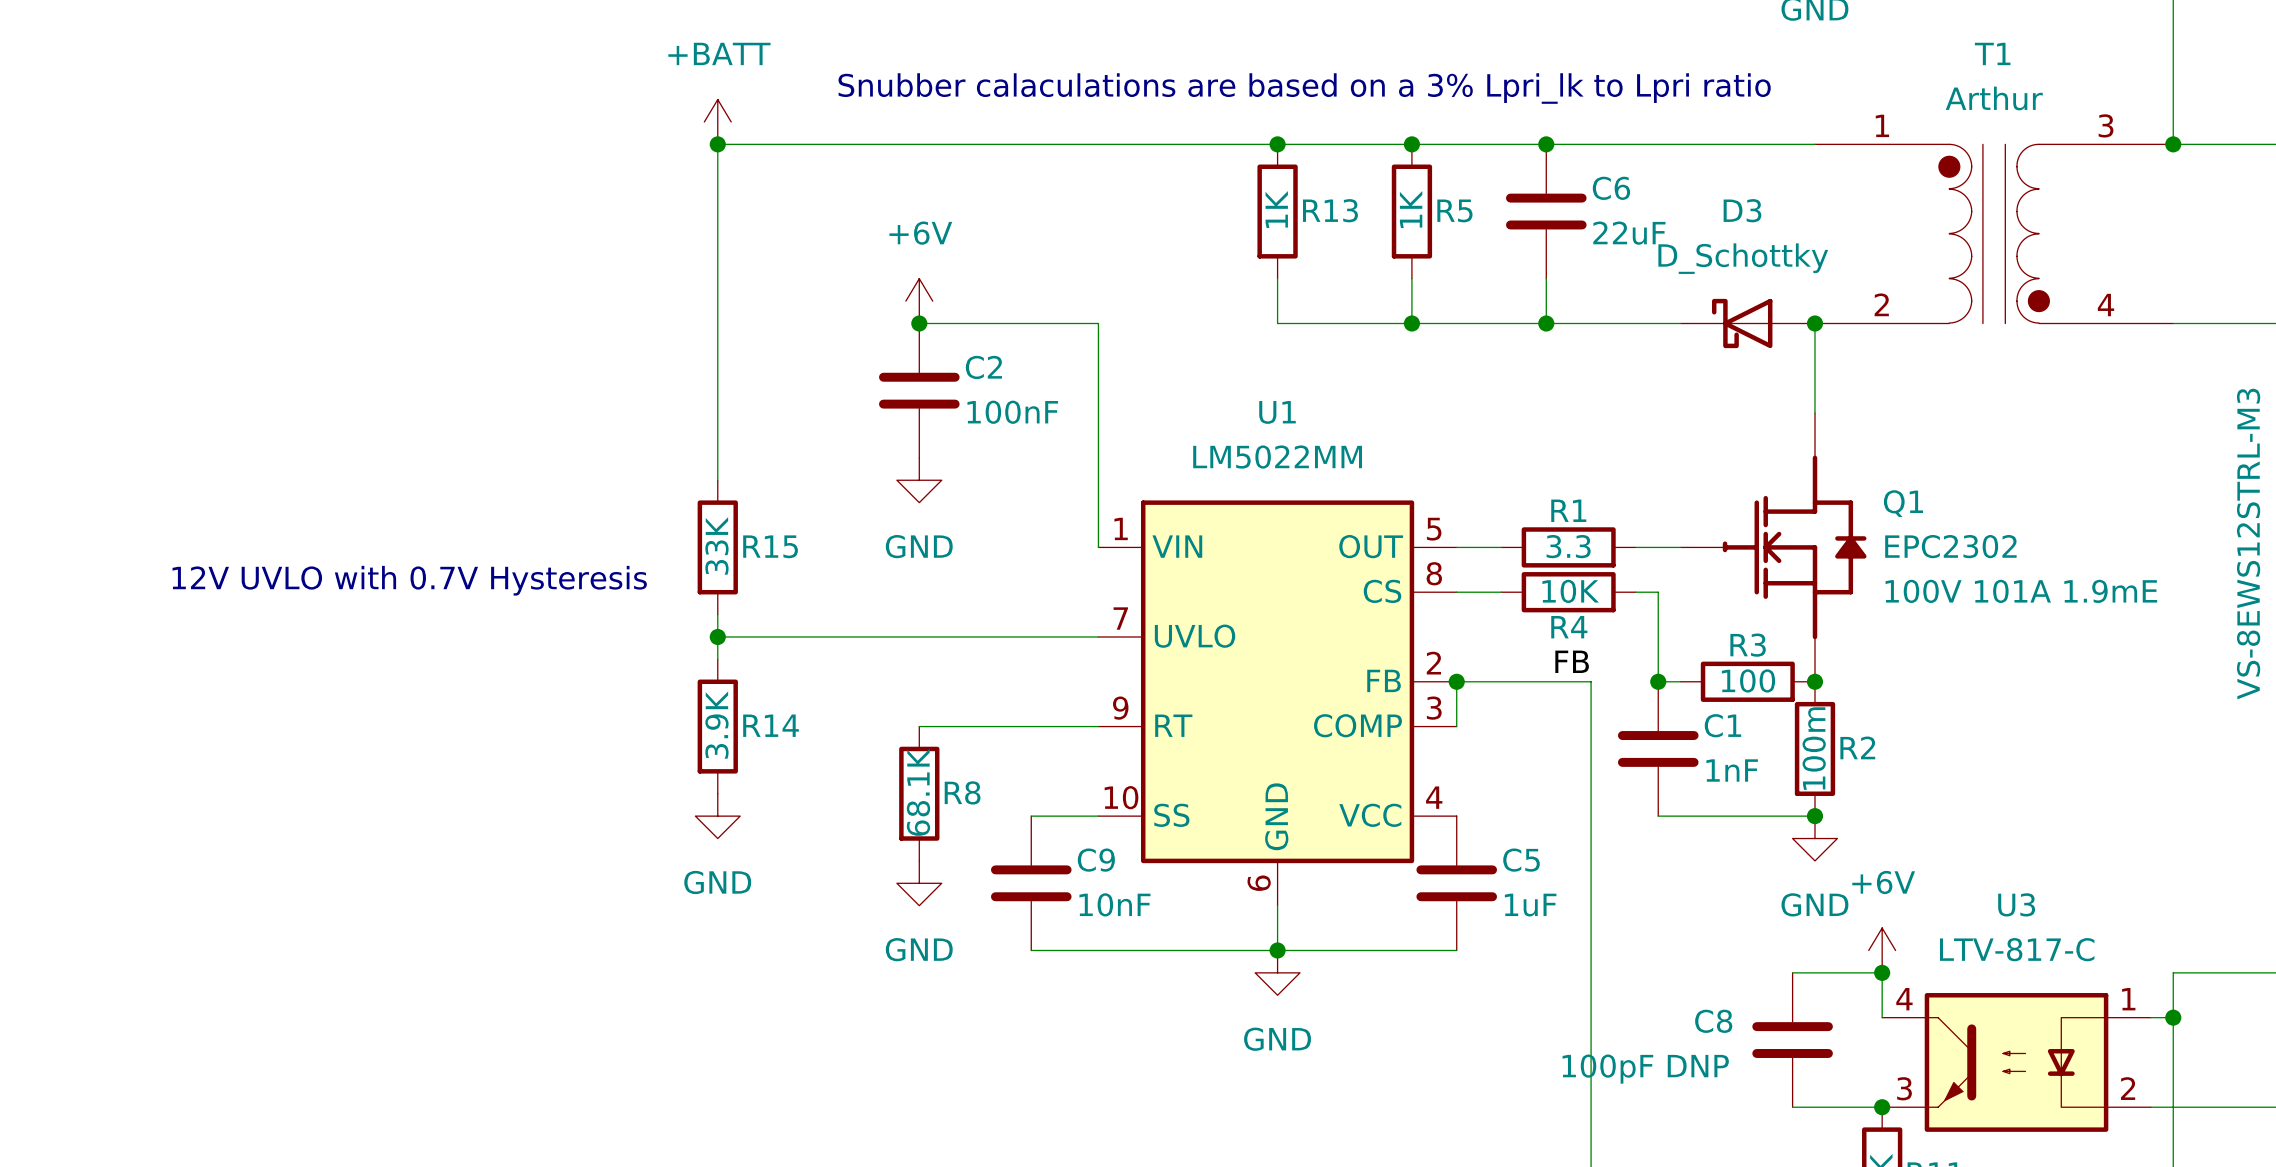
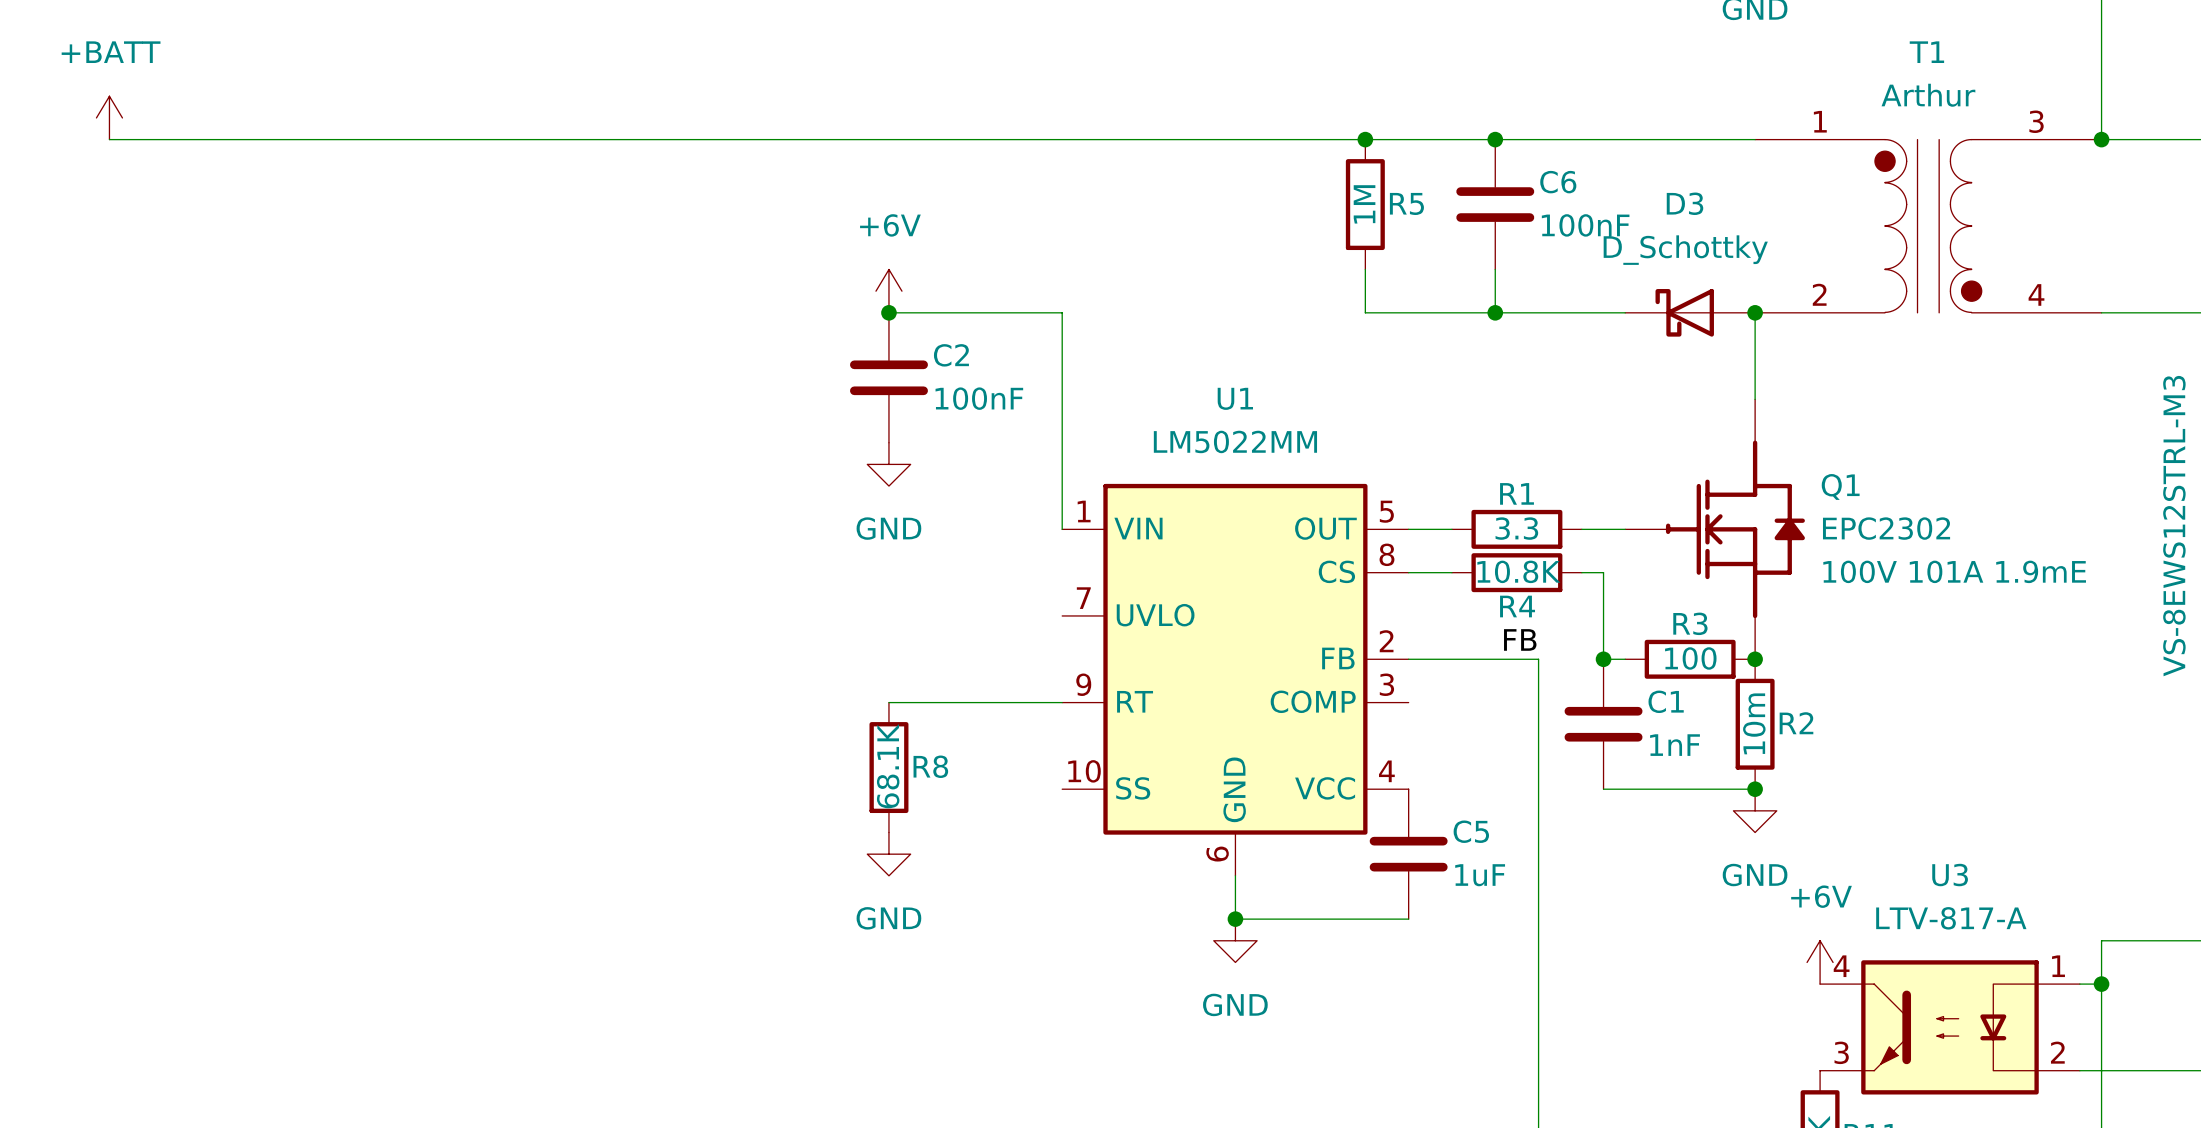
text: Snubber calaculations are based on a 3% Lpri_lk to Lpri ratio (1304, 88) -> none
power symbol: none -> +BATT (109, 117)
power symbol: +BATT (717, 121) -> none
wire: (717, 144) (717, 480) -> (694, 139) (109, 139)
junction: (717, 144) -> none
junction: (1277, 144) -> none
R5 value: 1K (1411, 209) -> 1M (1364, 204)
R13: 1K (1277, 211) -> none
C6 value: 22uF (1629, 233) -> 100nF (1585, 225)
wire: (1277, 278) (1277, 323) (1411, 323) -> none
junction: (1411, 323) -> none
R15: 33K (717, 547) -> none
text: 12V UVLO with 0.7V Hysteresis (409, 580) -> none
R4 value: 10K (1570, 591) -> 10.8K (1518, 571)
wire: (717, 614) (717, 659) -> none
wire: (717, 636) (1098, 636) -> none
junction: (717, 636) -> none
wire: (1456, 681) (1456, 726) -> none
junction: (1456, 681) -> none
R14: 3.9K (717, 726) -> none
R2 value: 100m (1814, 748) -> 10m (1754, 723)
power symbol: GND (717, 816) -> none
wire: (1031, 816) (1098, 816) -> none
C9: 10nF (1031, 883) -> none
U3 value: LTV-817-C (2017, 949) -> LTV-817-A (1951, 918)
wire: (1031, 950) (1277, 950) -> none
power symbol position: +6V (1882, 950) -> +6V (1820, 962)
wire: (1792, 972) (1882, 972) (1882, 1017) -> none
junction: (1882, 972) -> none
C8: 100pF DNP (1792, 1040) -> none
wire: (1792, 1107) (1882, 1107) -> none
junction: (1882, 1107) -> none

